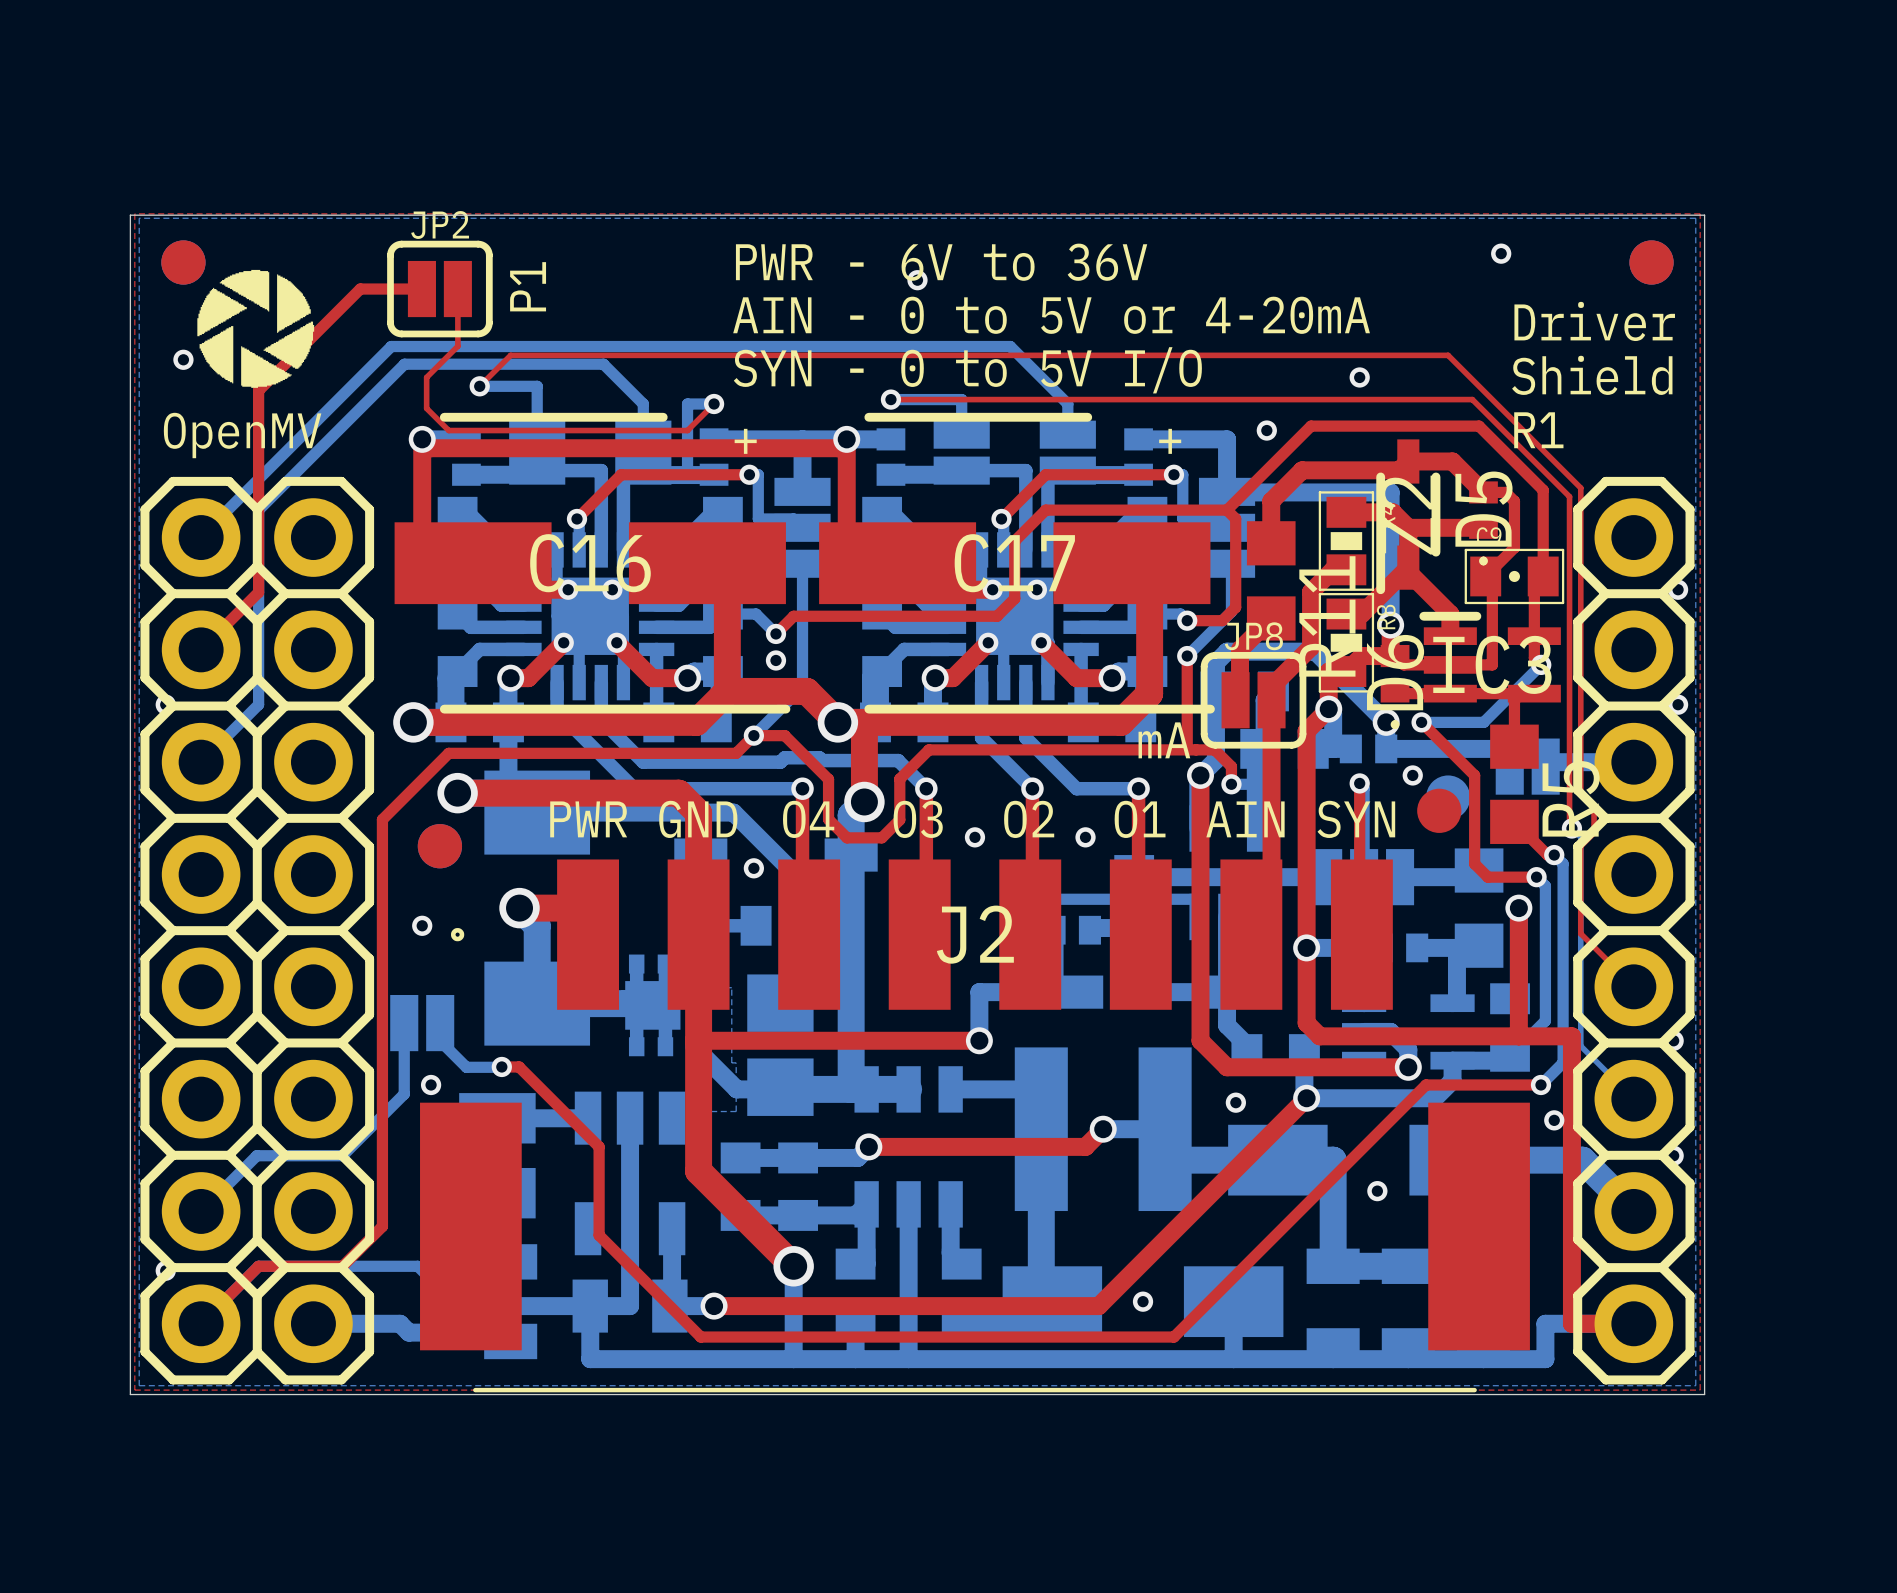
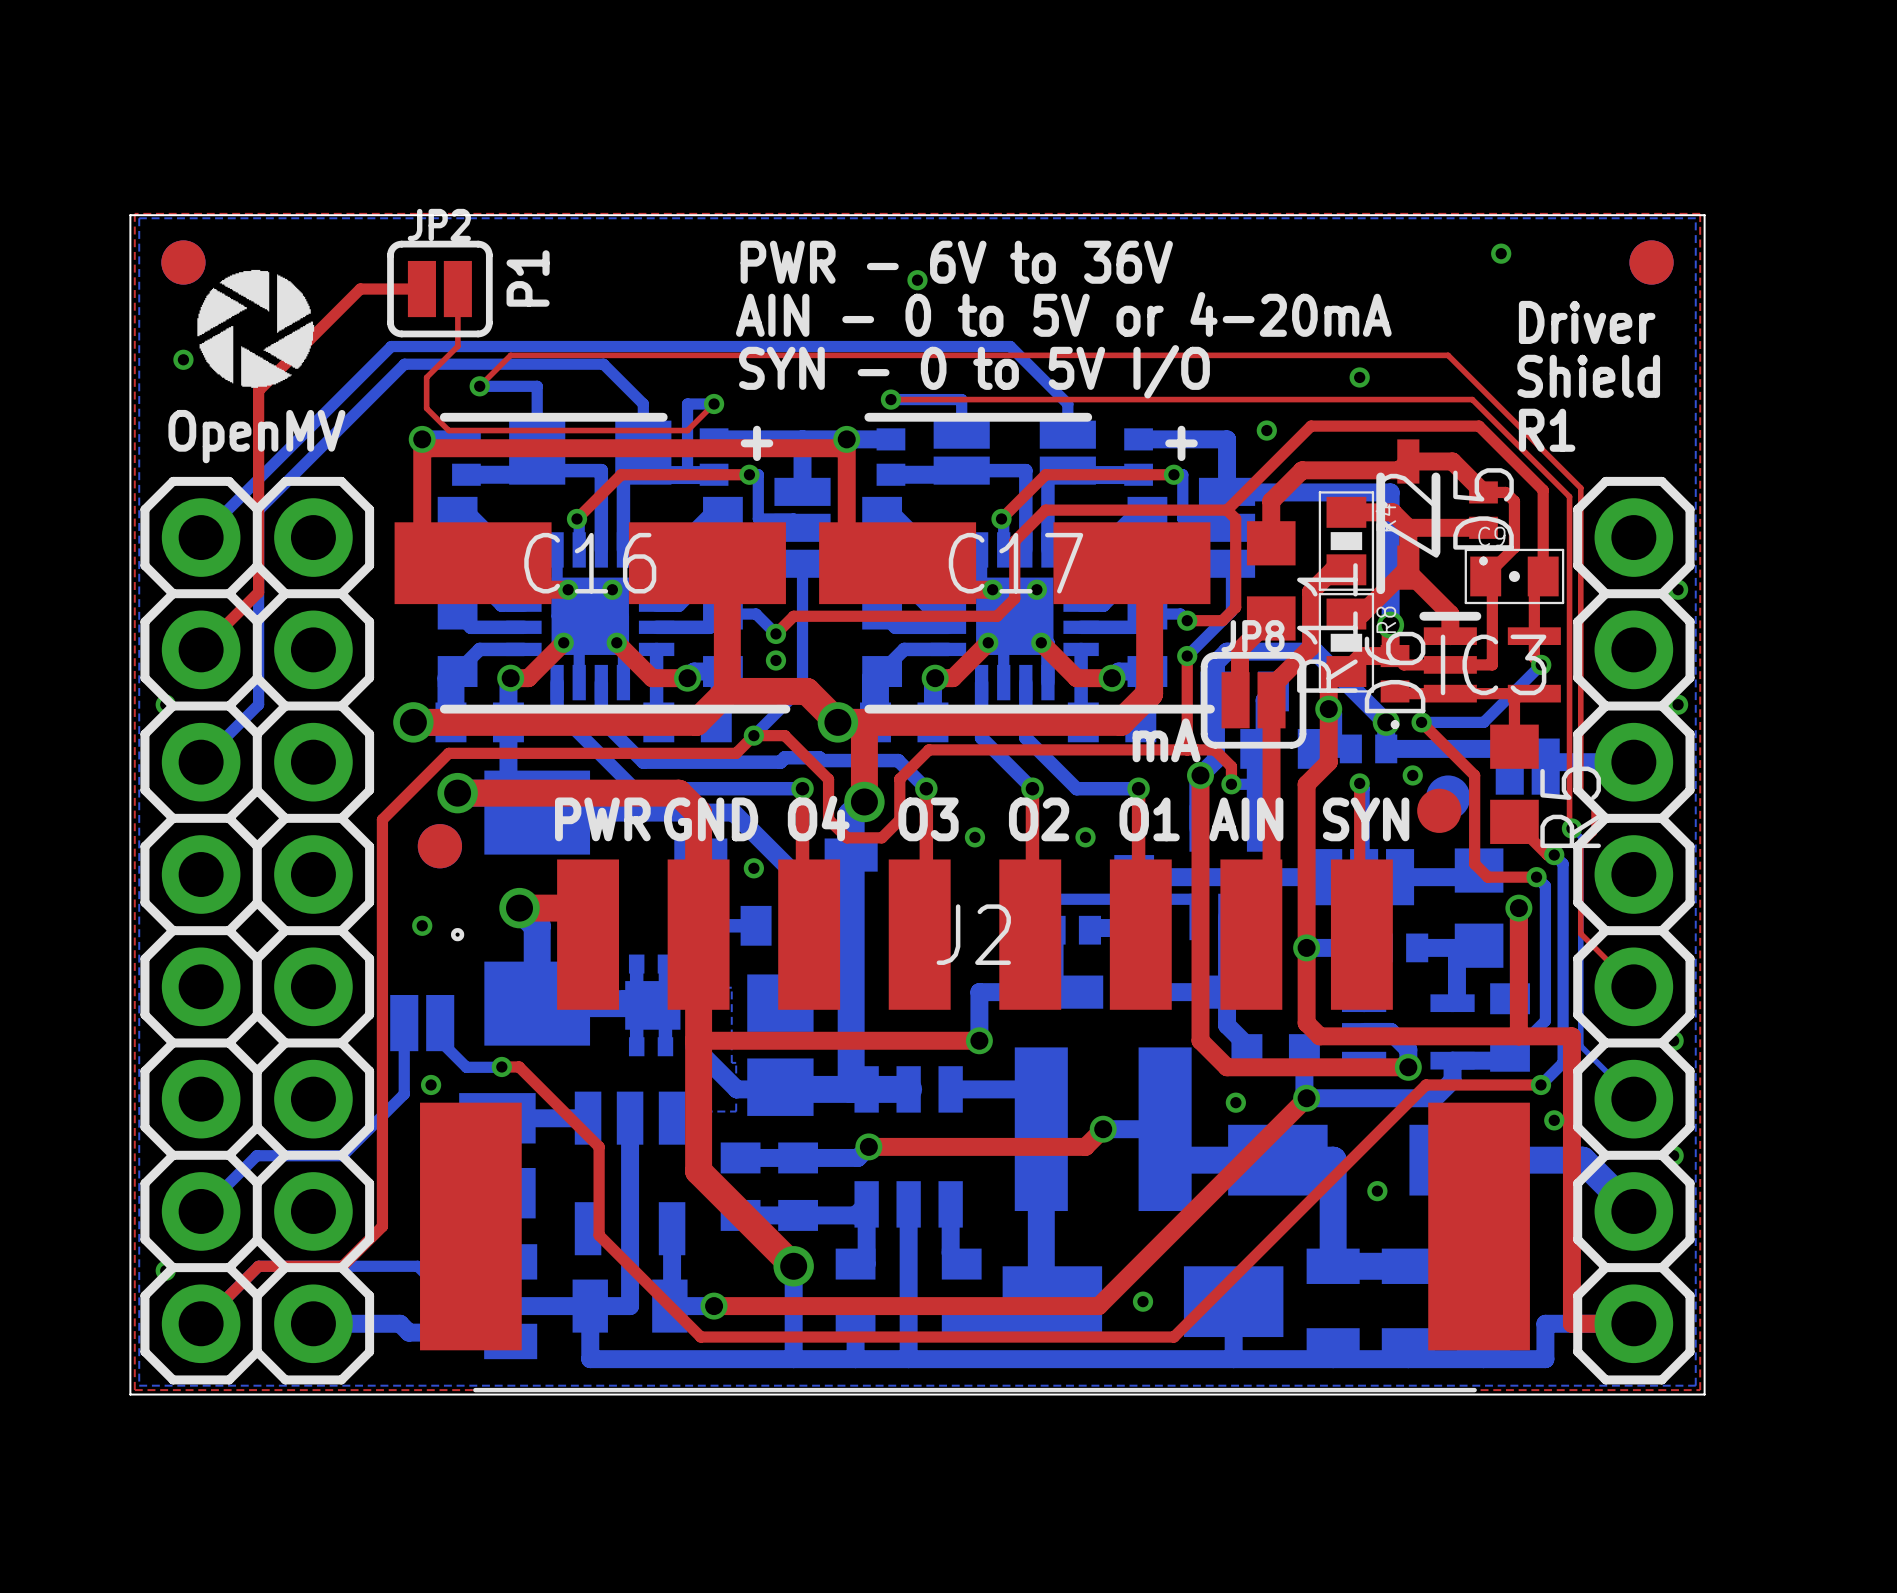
top track: (1328, 709) (1306, 731) (1306, 784) -> (1328, 709) (1328, 762) (1306, 784)
text position: mA (1164, 740) -> mA (1166, 740)

